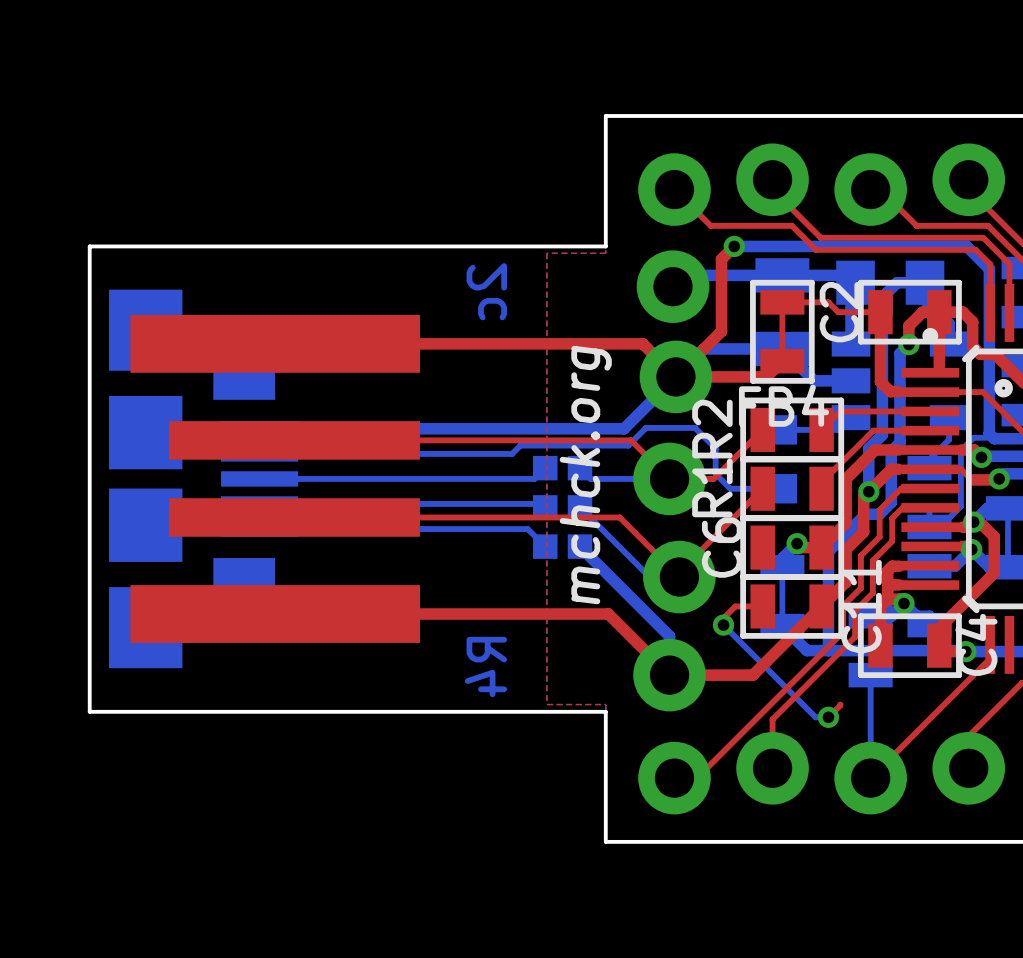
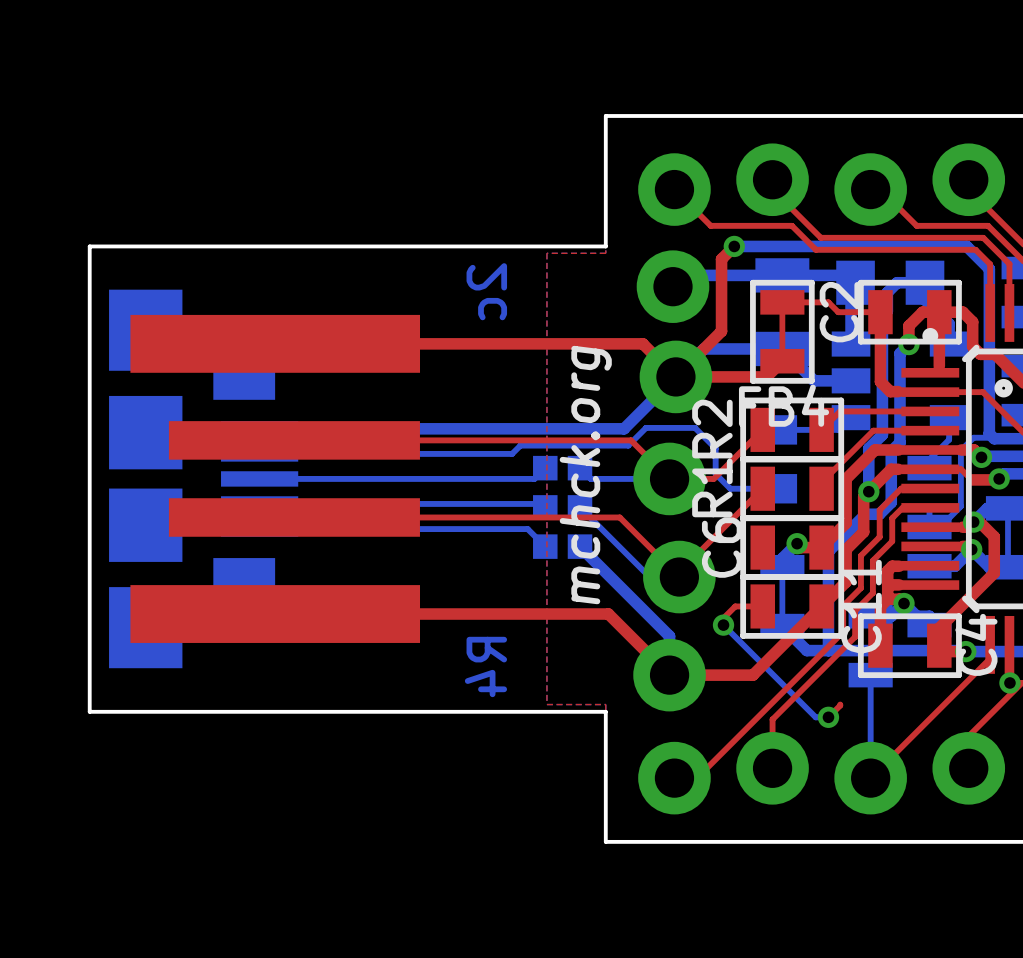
via: none -> (1009, 682)

